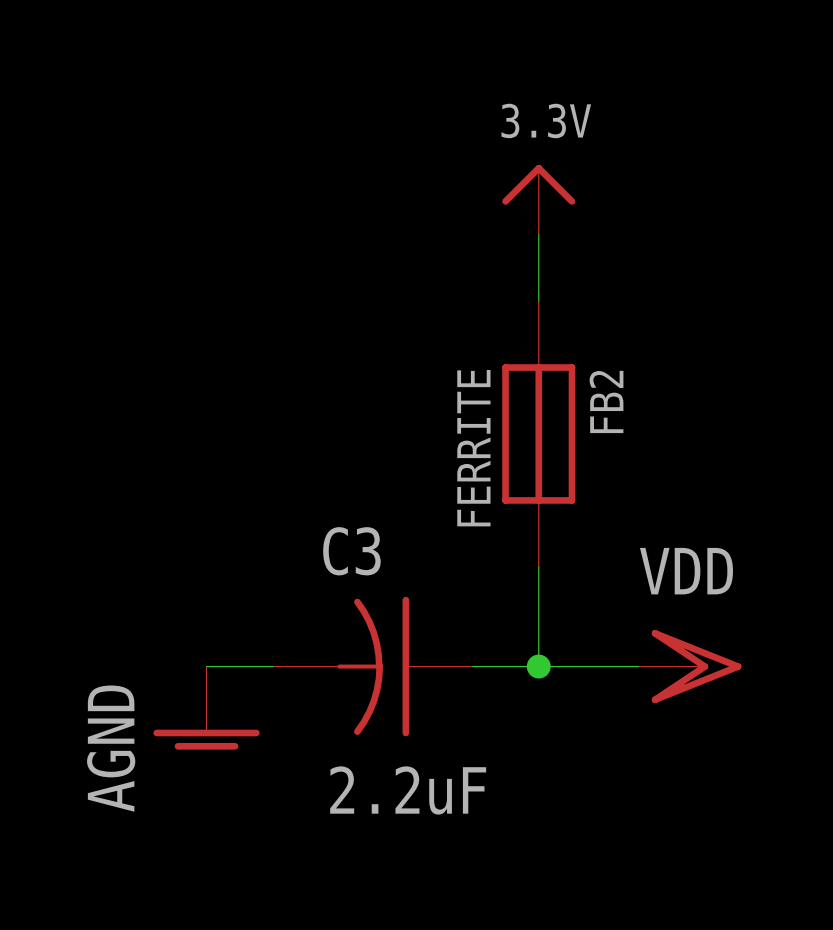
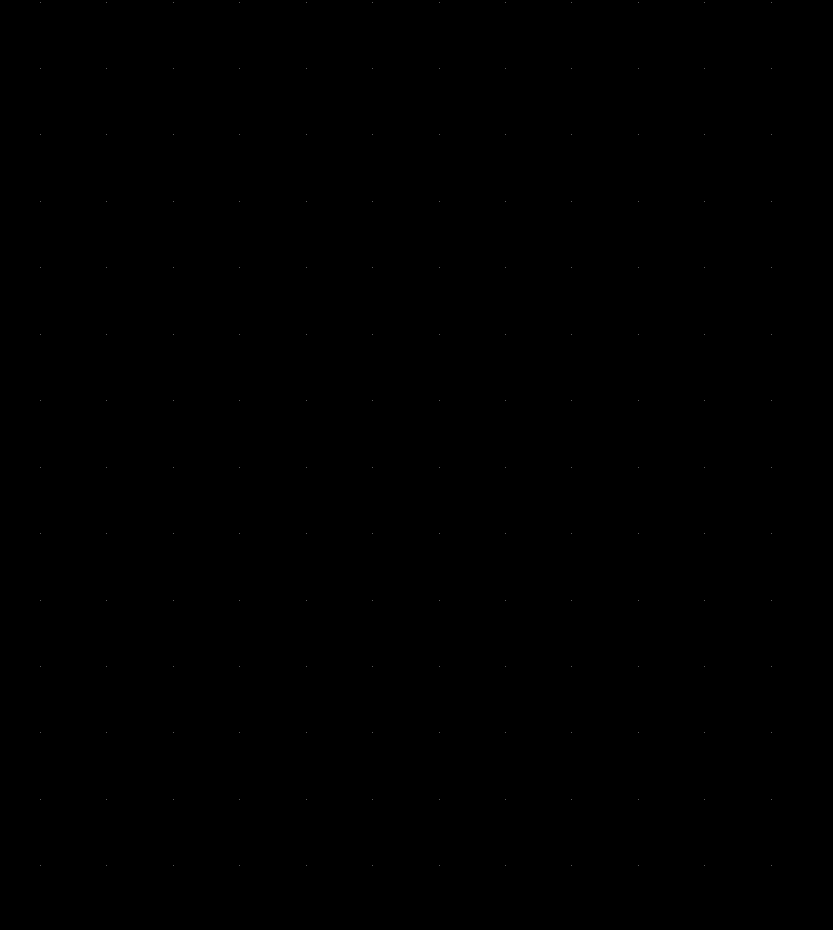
power symbol: 3.3V (538, 199) -> none
wire: (538, 234) (538, 301) -> none
FB2: FERRITE (538, 433) -> none
wire: (538, 566) (538, 666) -> none
wire: (206, 666) (272, 666) -> none
C3: 2.2uF (372, 666) -> none
wire: (472, 666) (638, 666) -> none
junction: (538, 666) -> none
power symbol: VDD (689, 666) -> none
power symbol: AGND (206, 708) -> none

